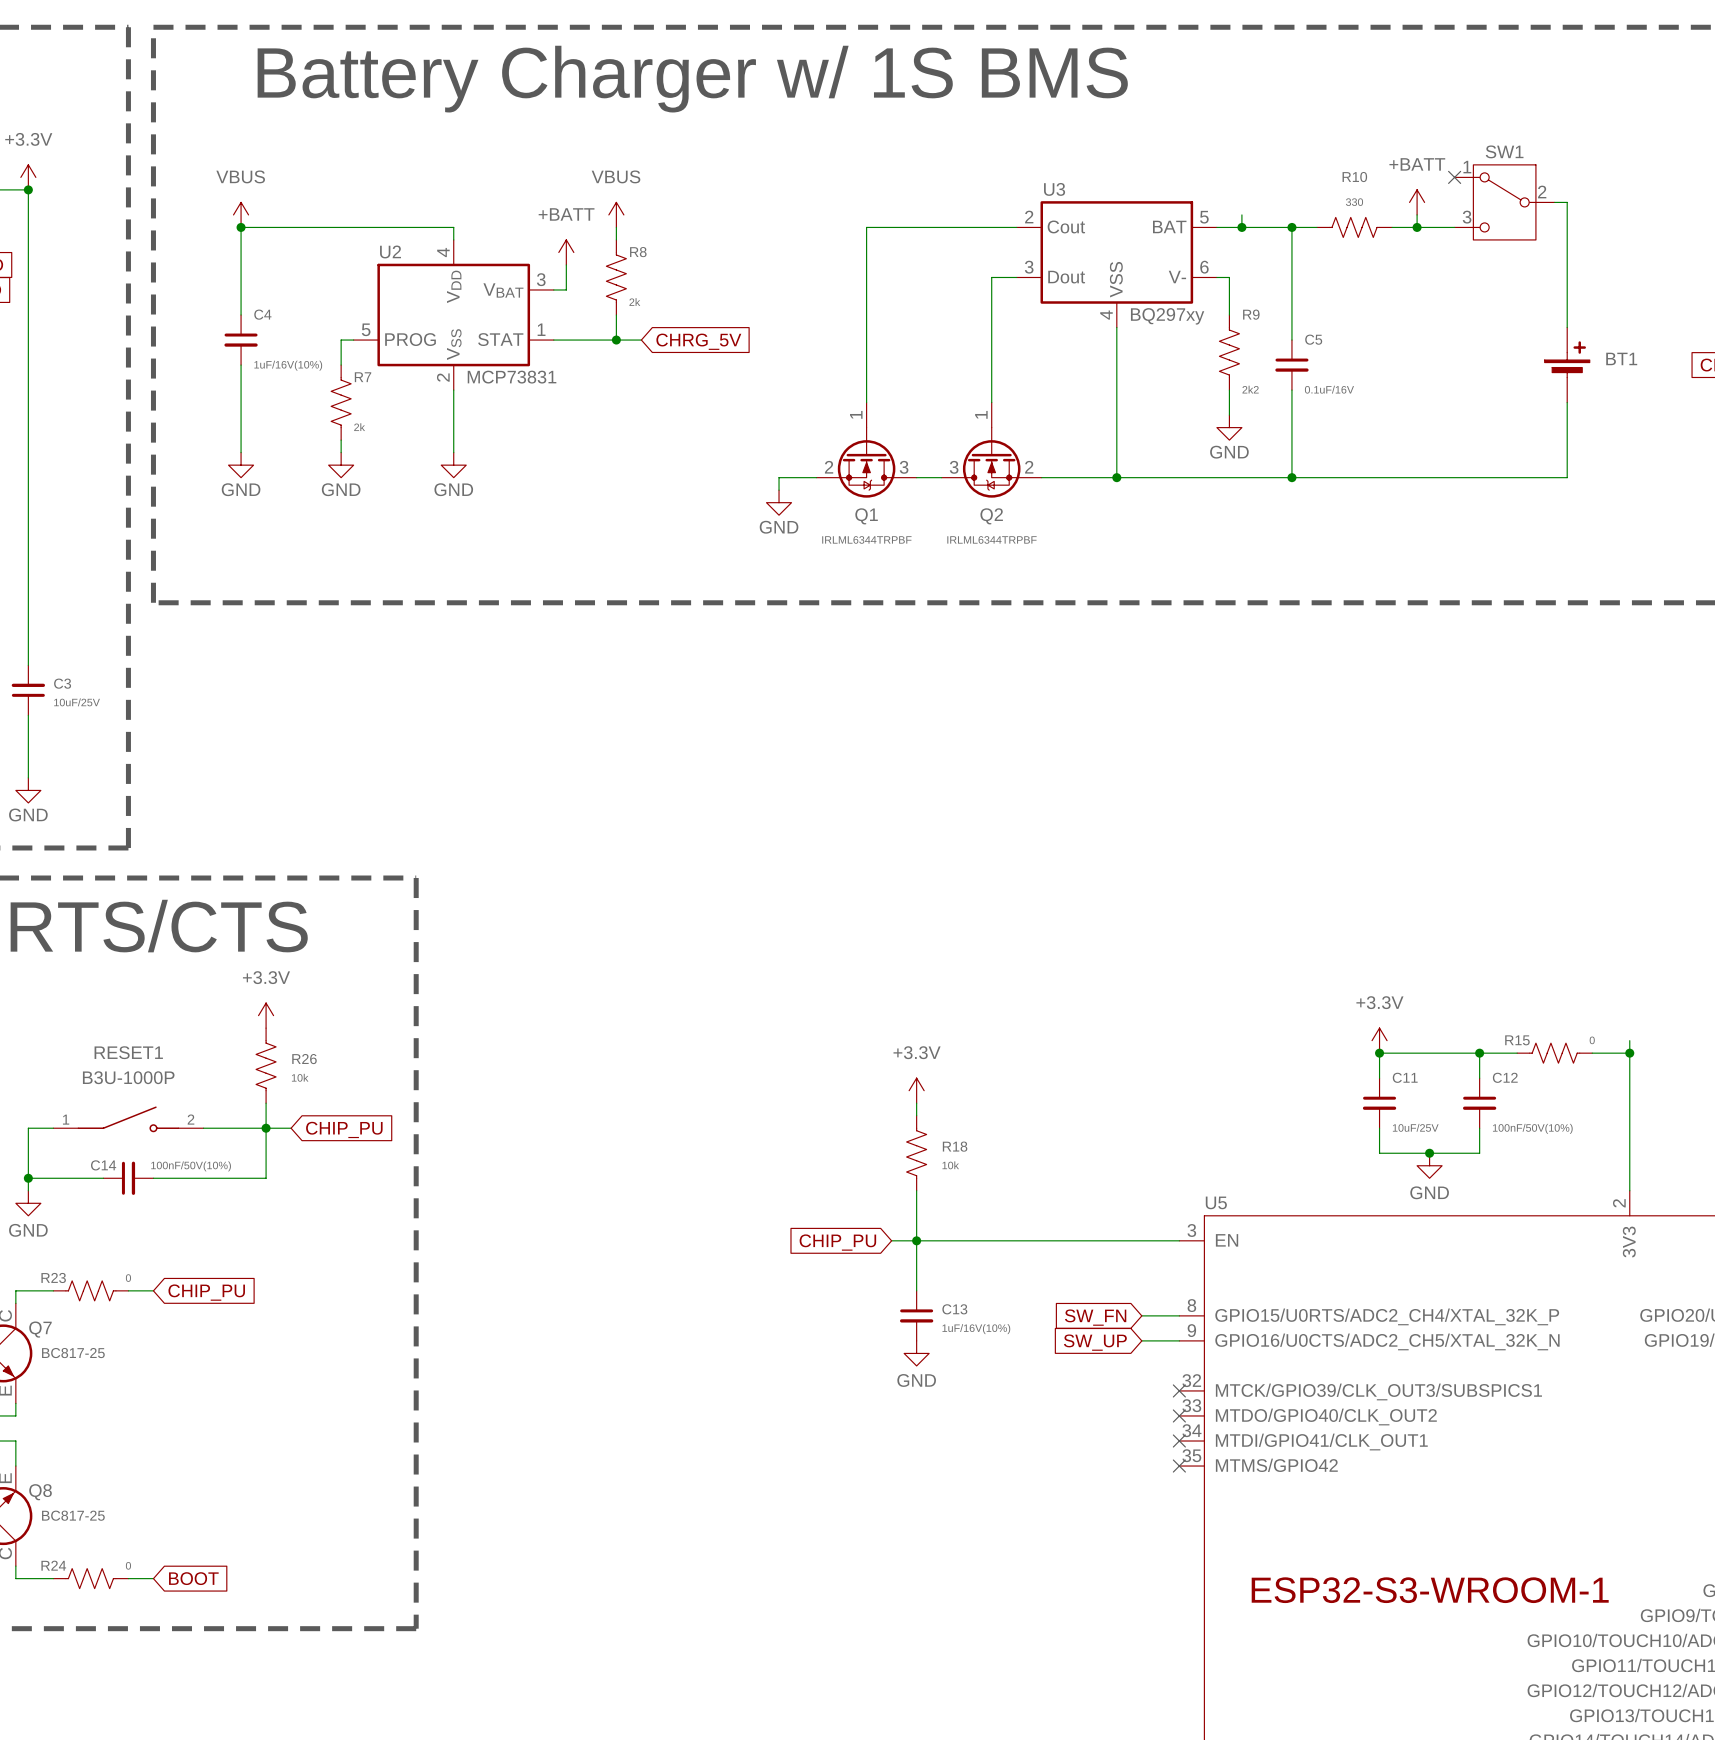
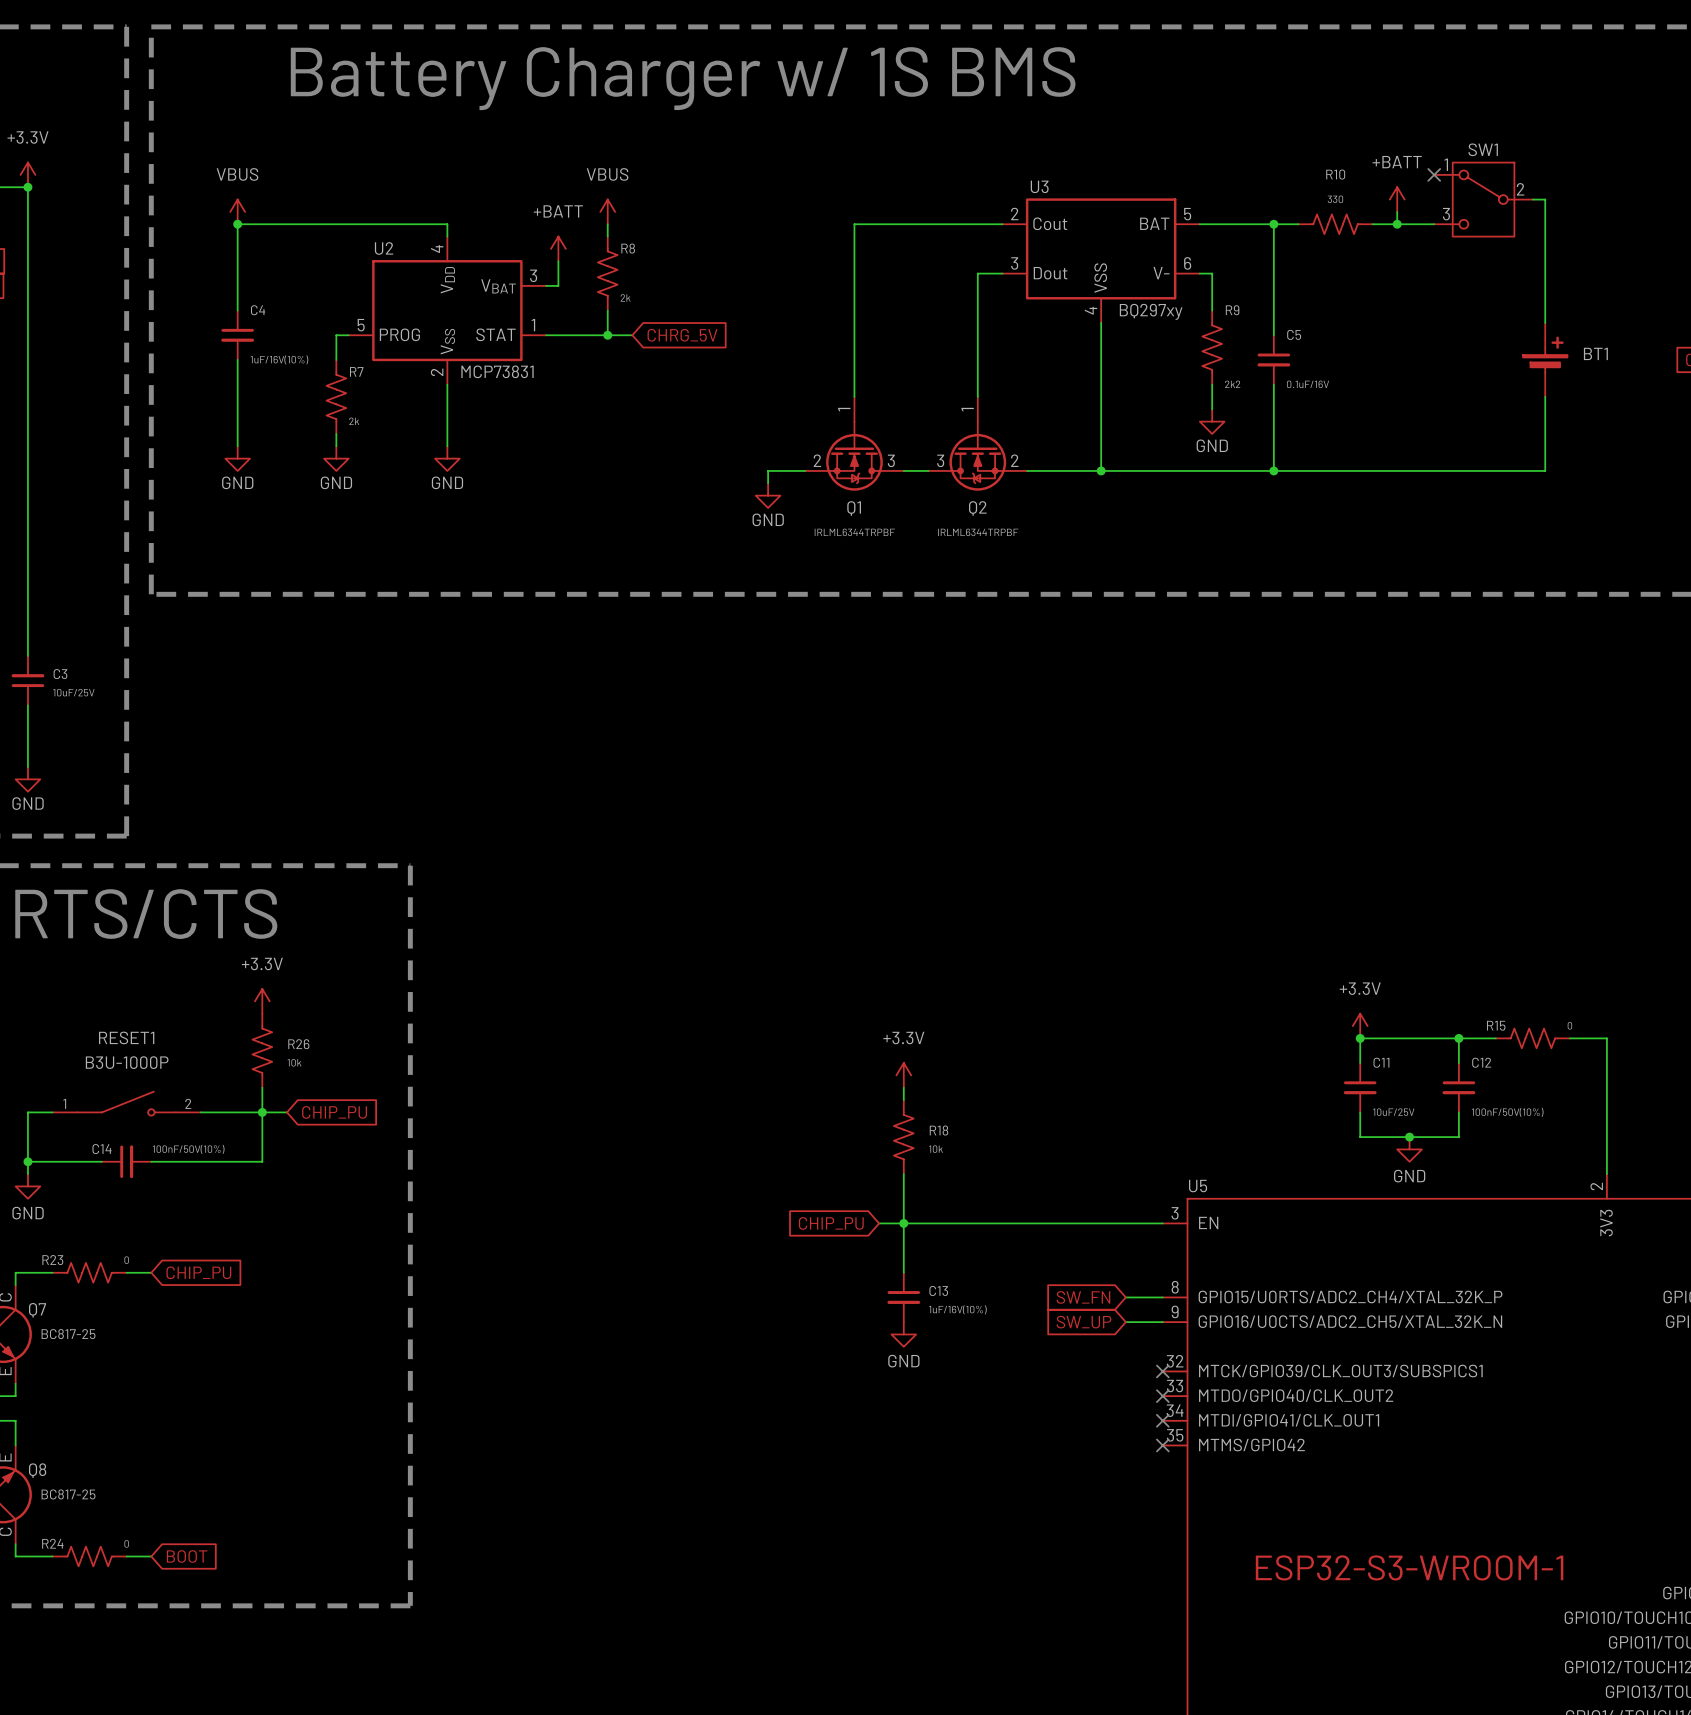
wire: (1241, 214) (1241, 227) -> none
junction: (1241, 227) -> none
wire: (1629, 1040) (1629, 1053) -> none
junction: (1629, 1053) -> none

